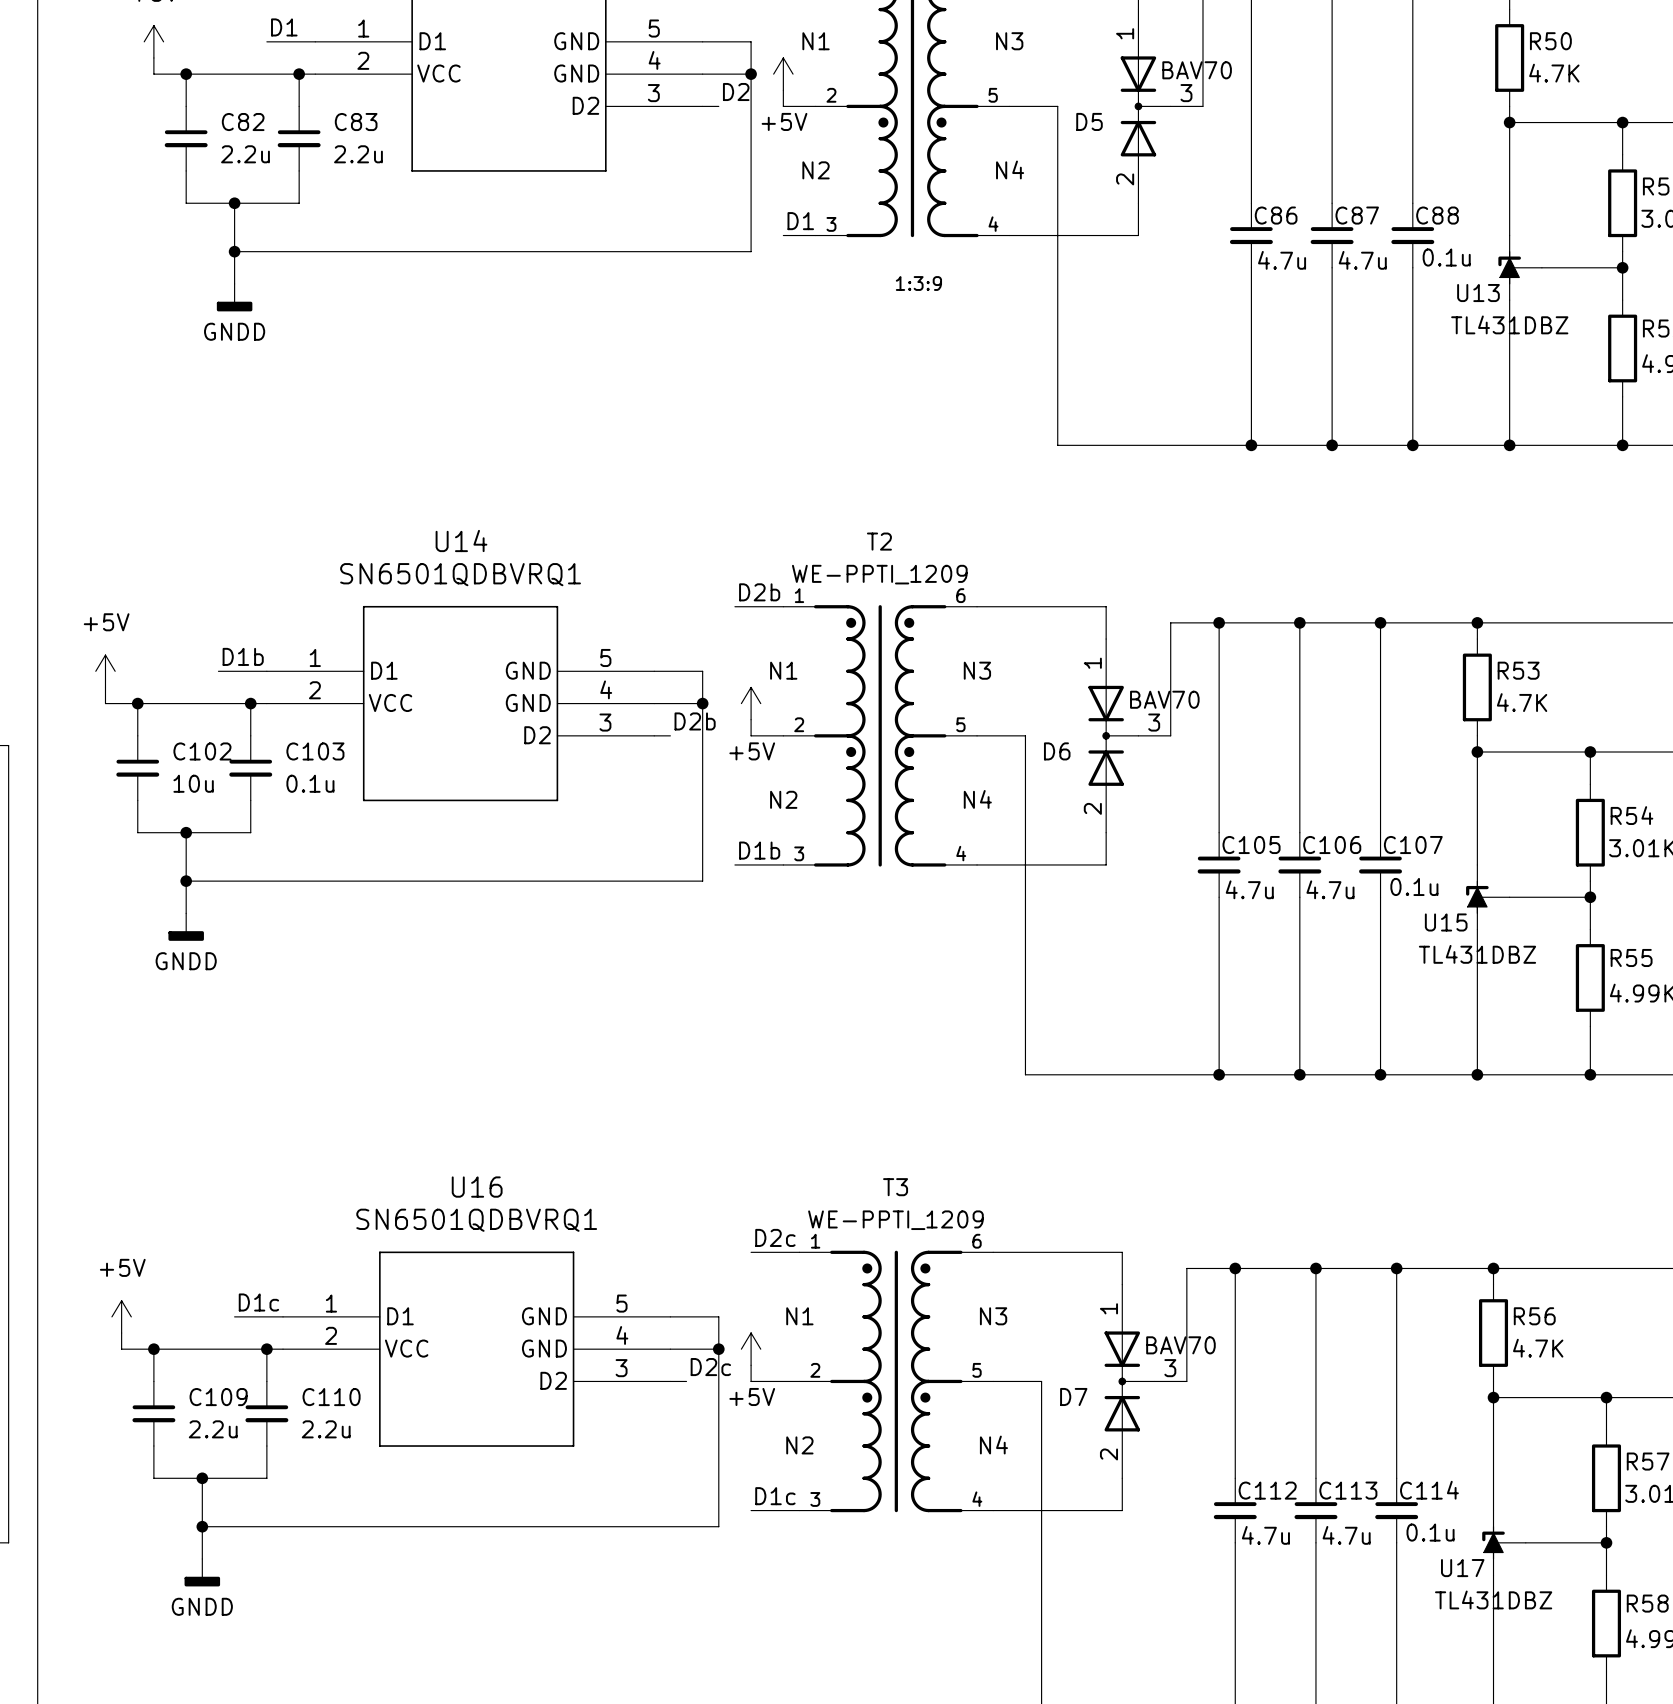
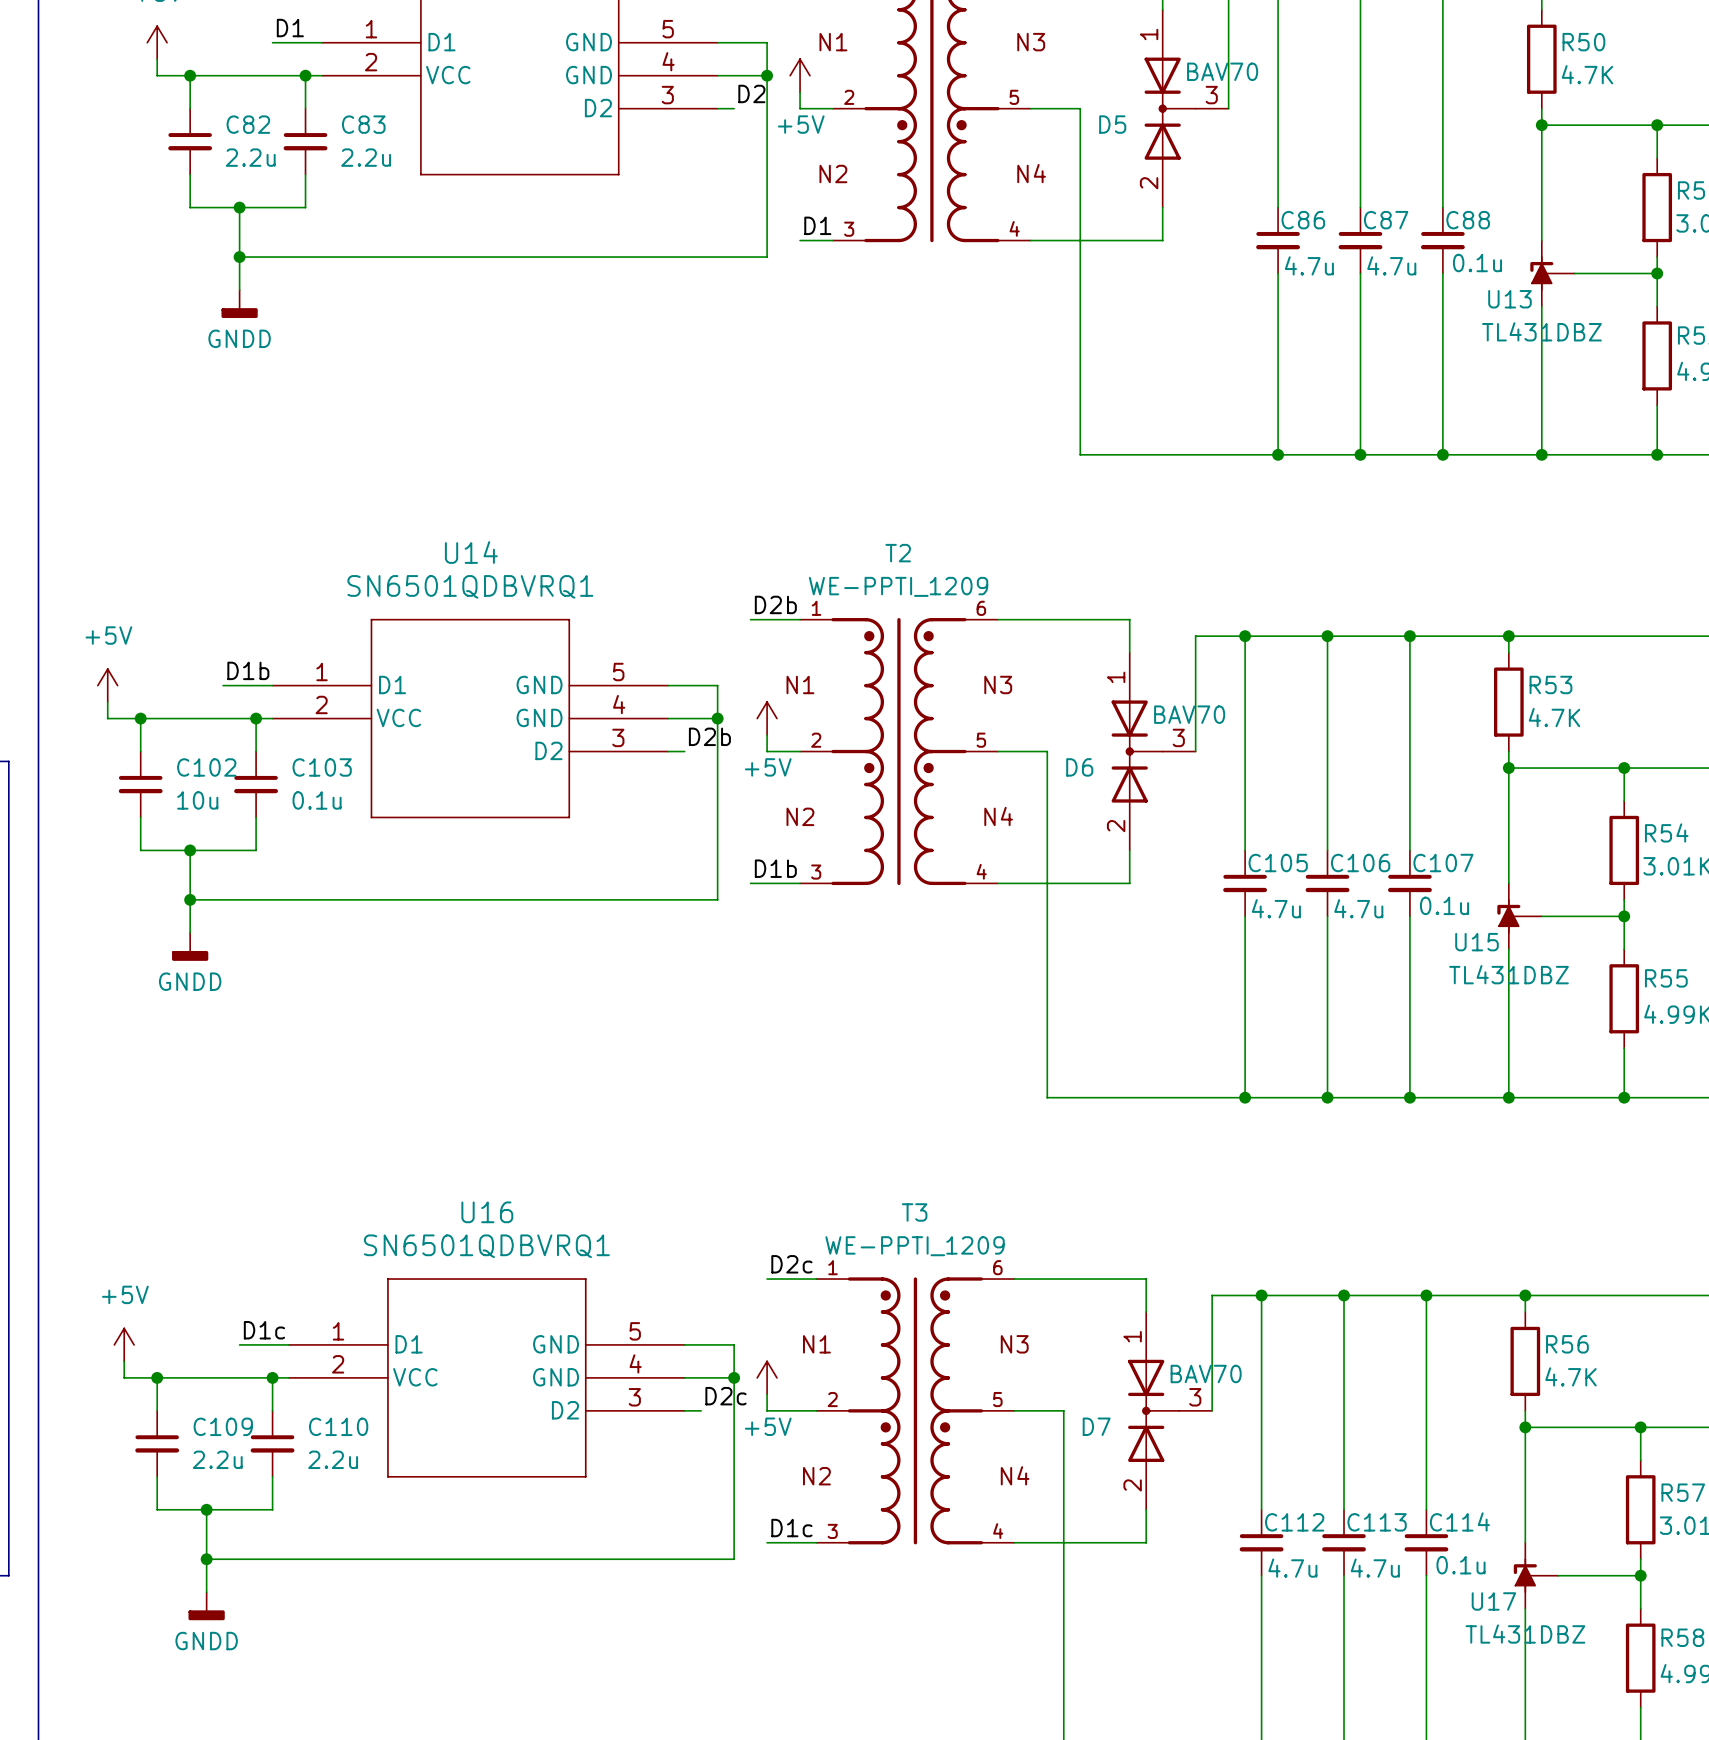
text: 1:3:9 (918, 283) -> none

